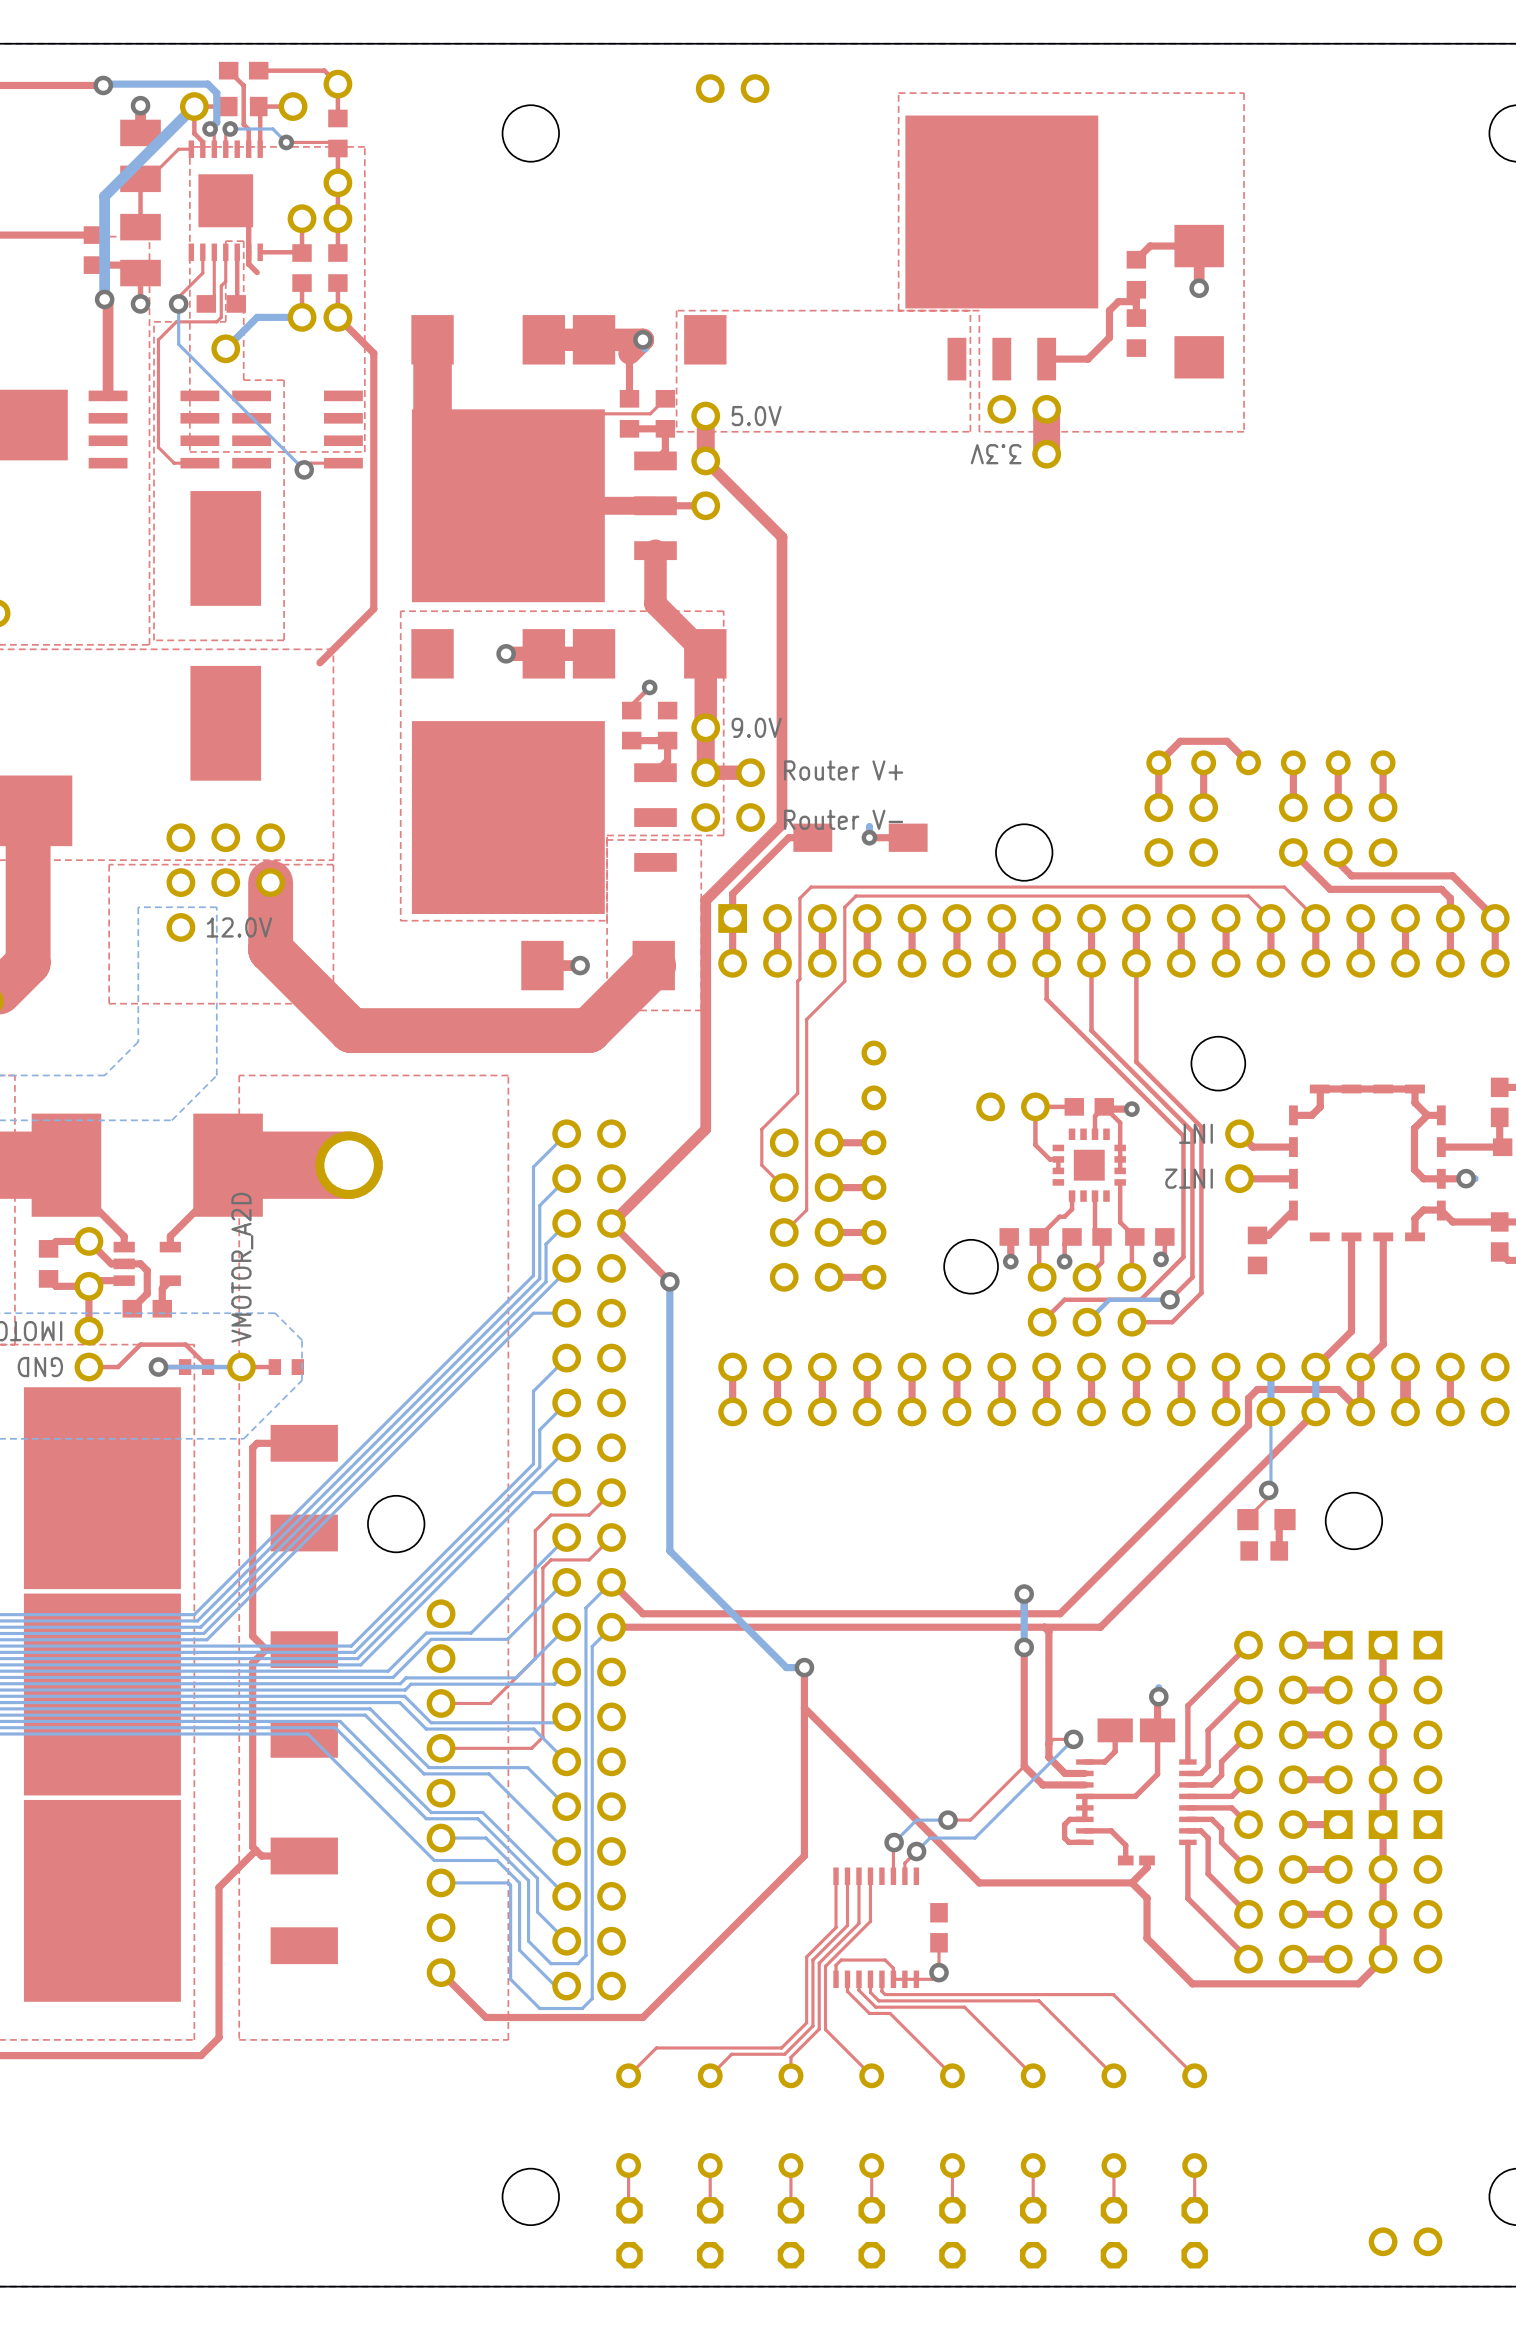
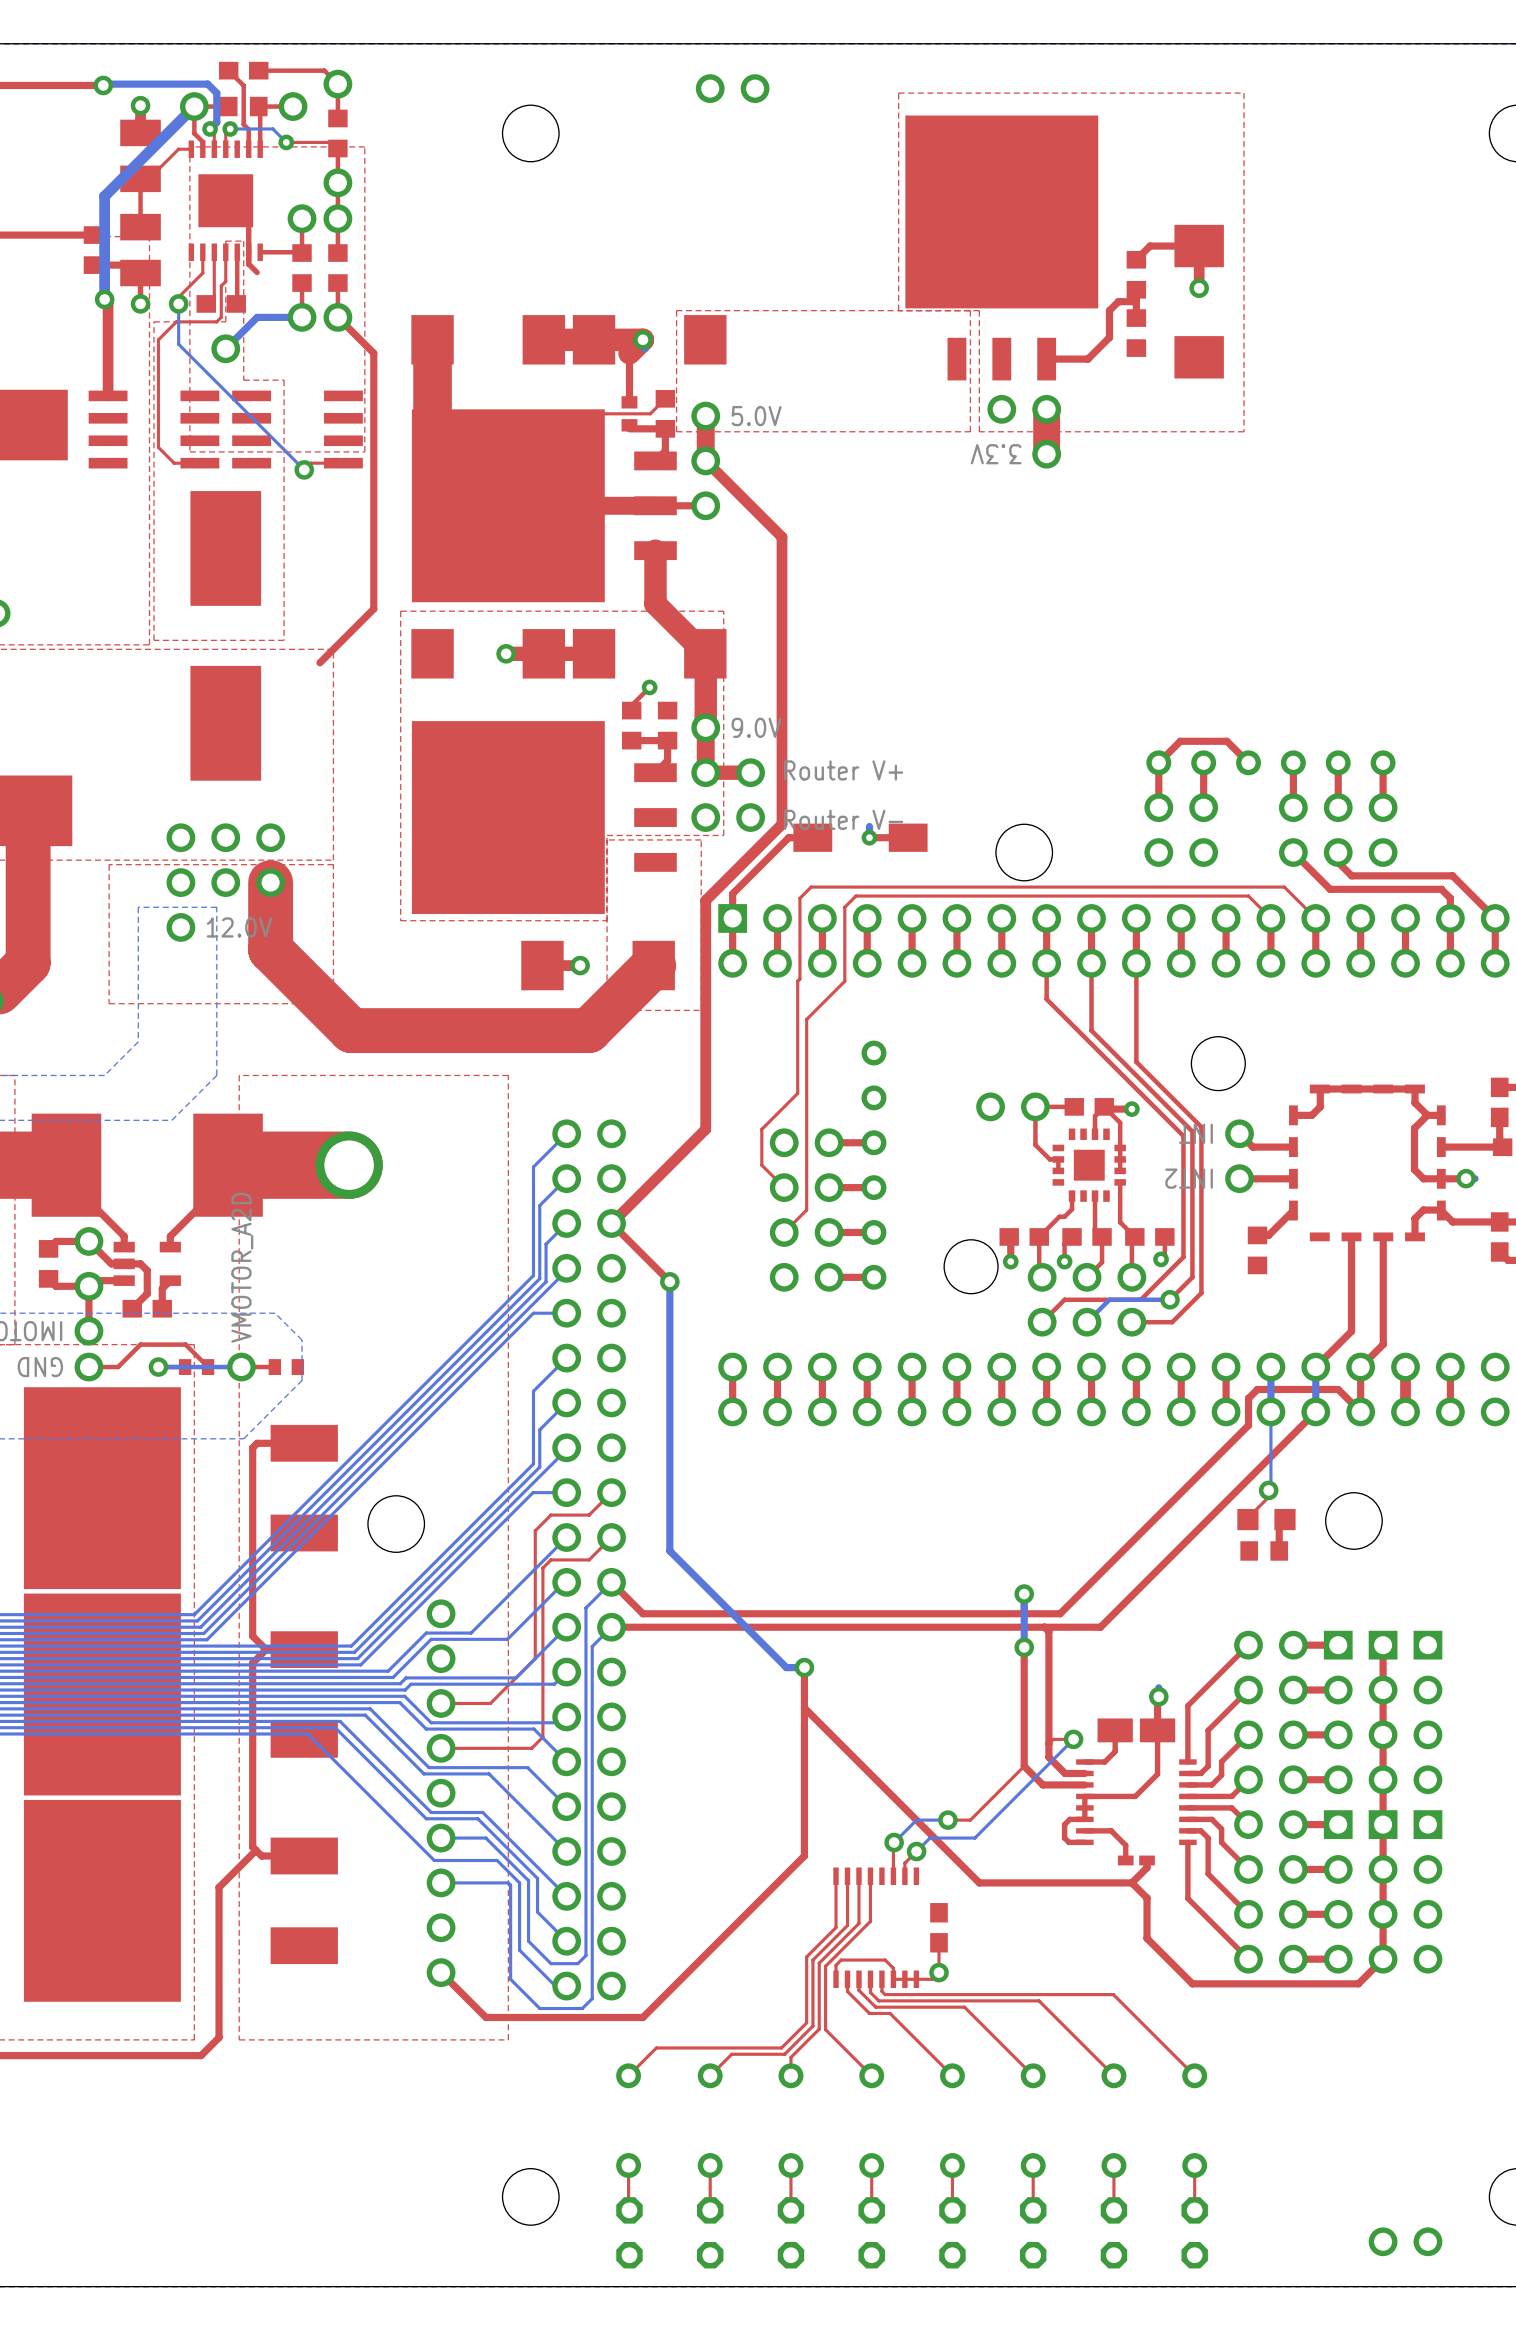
part footprint: [619, 389, 640, 438] -> [621, 396, 638, 432]

